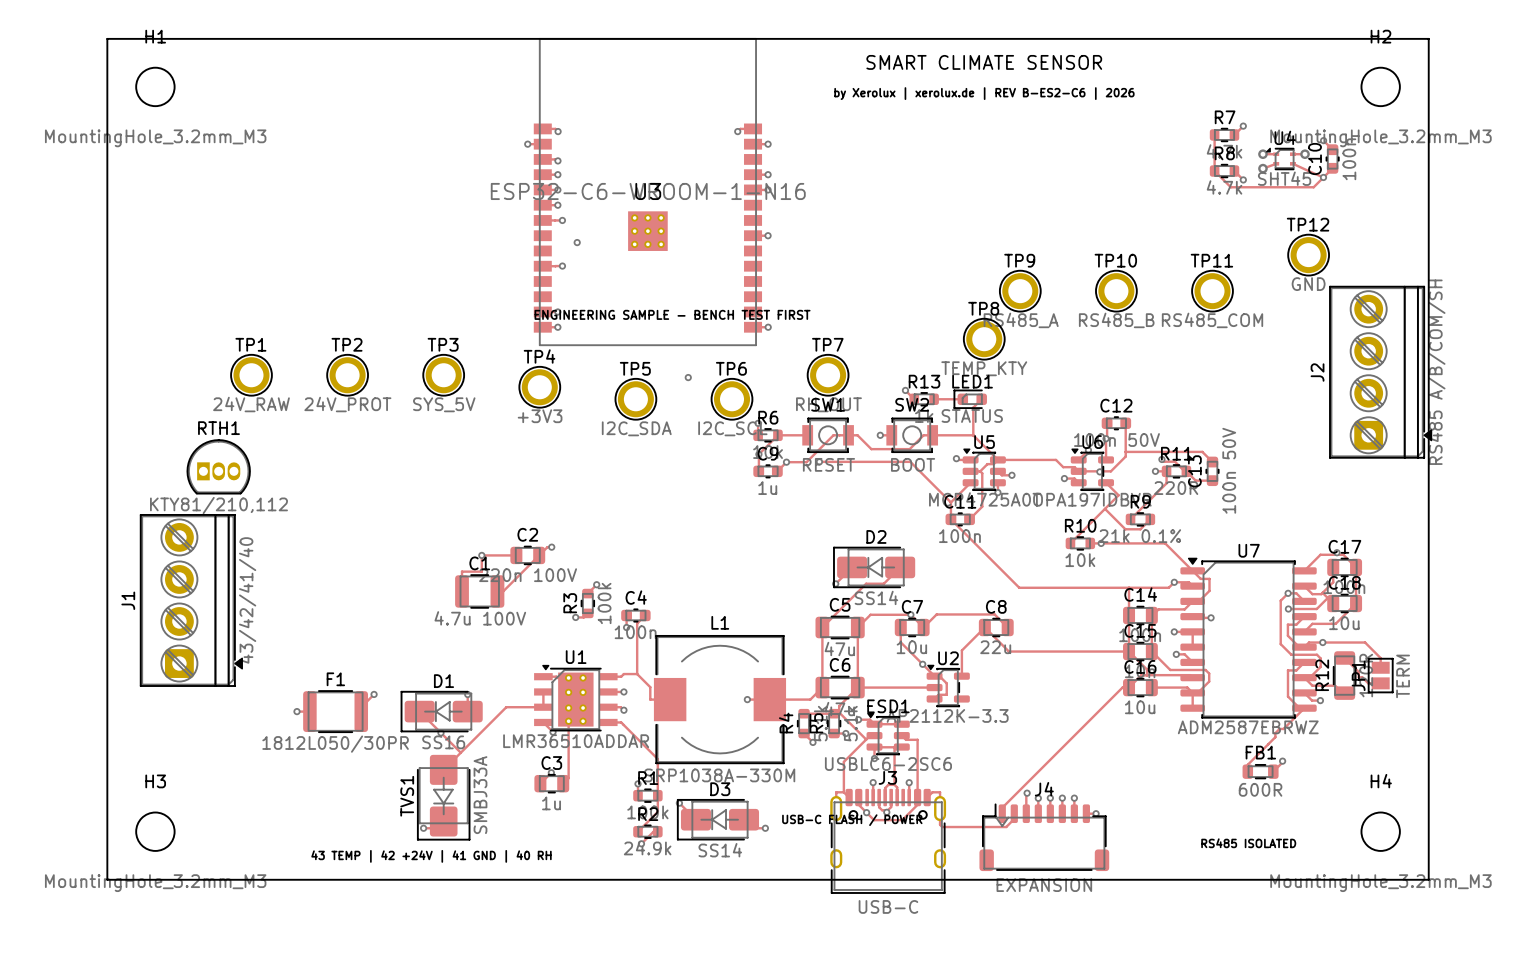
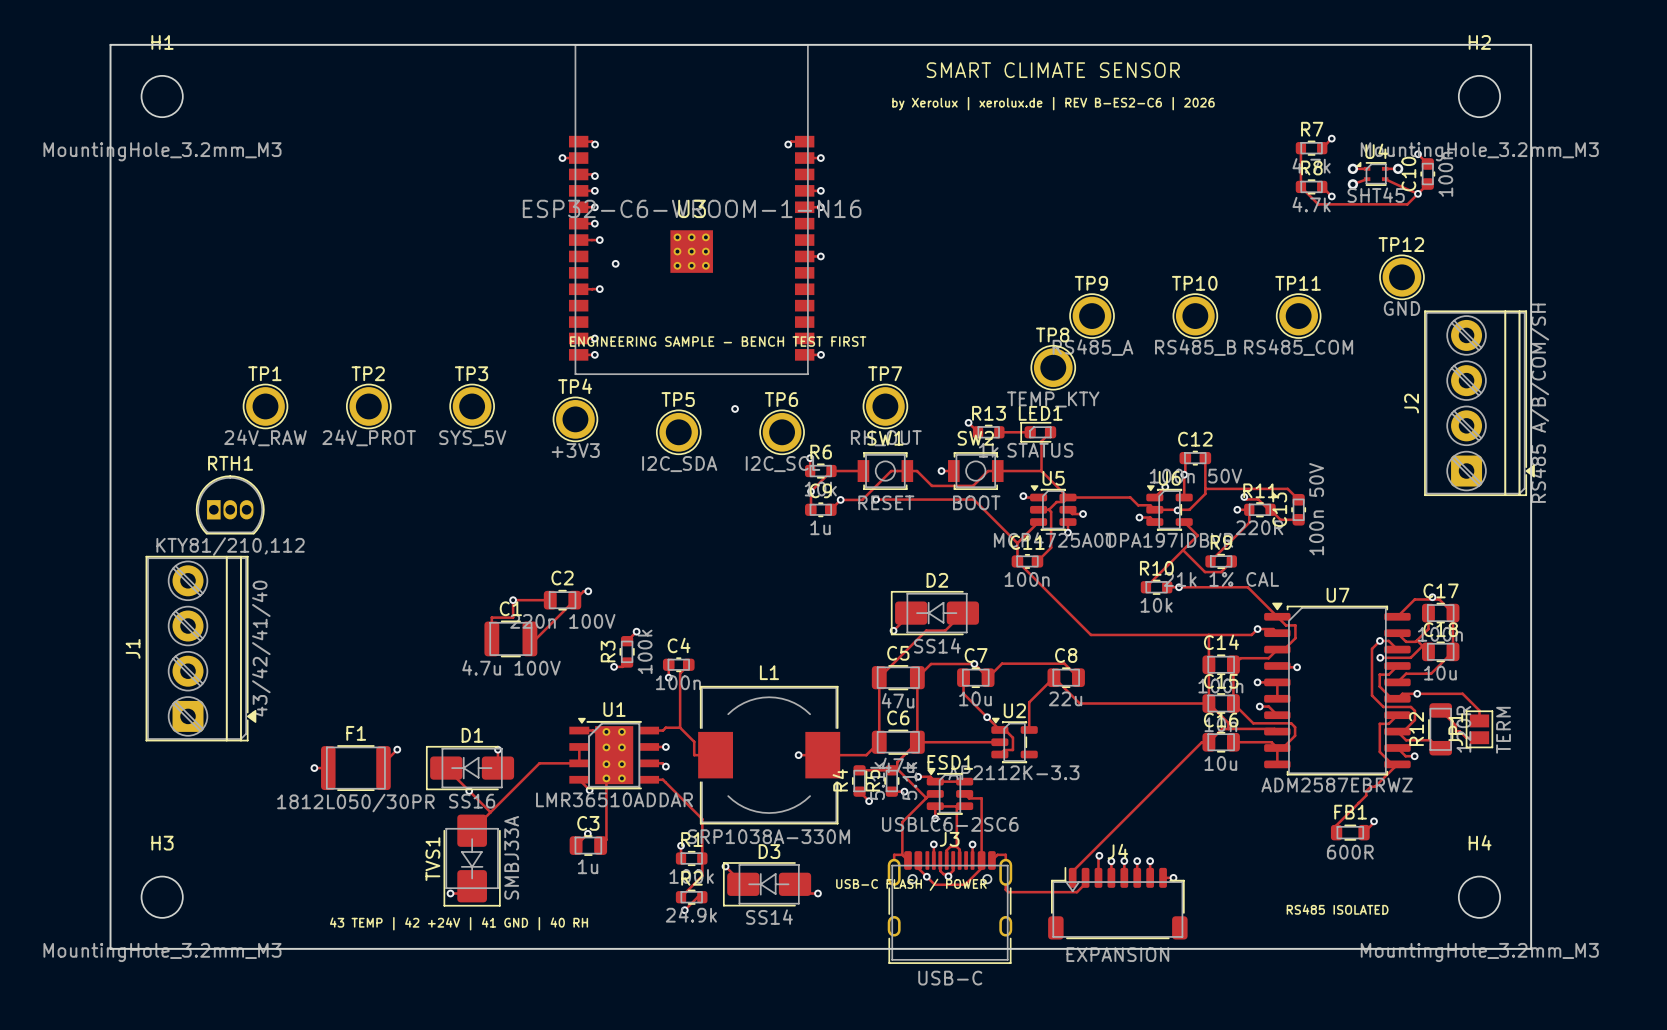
R9 value: 21k 0.1% (1140, 536) -> 21k 1% CAL (1221, 579)

